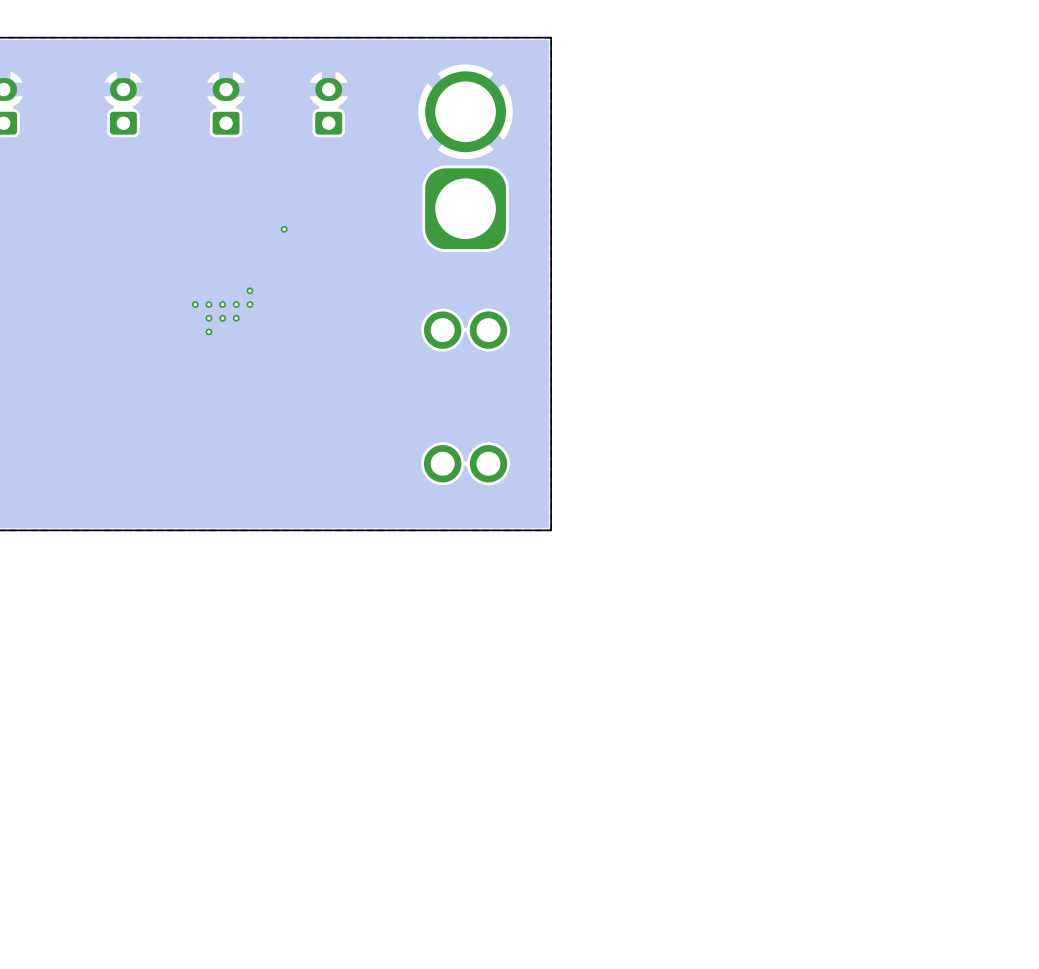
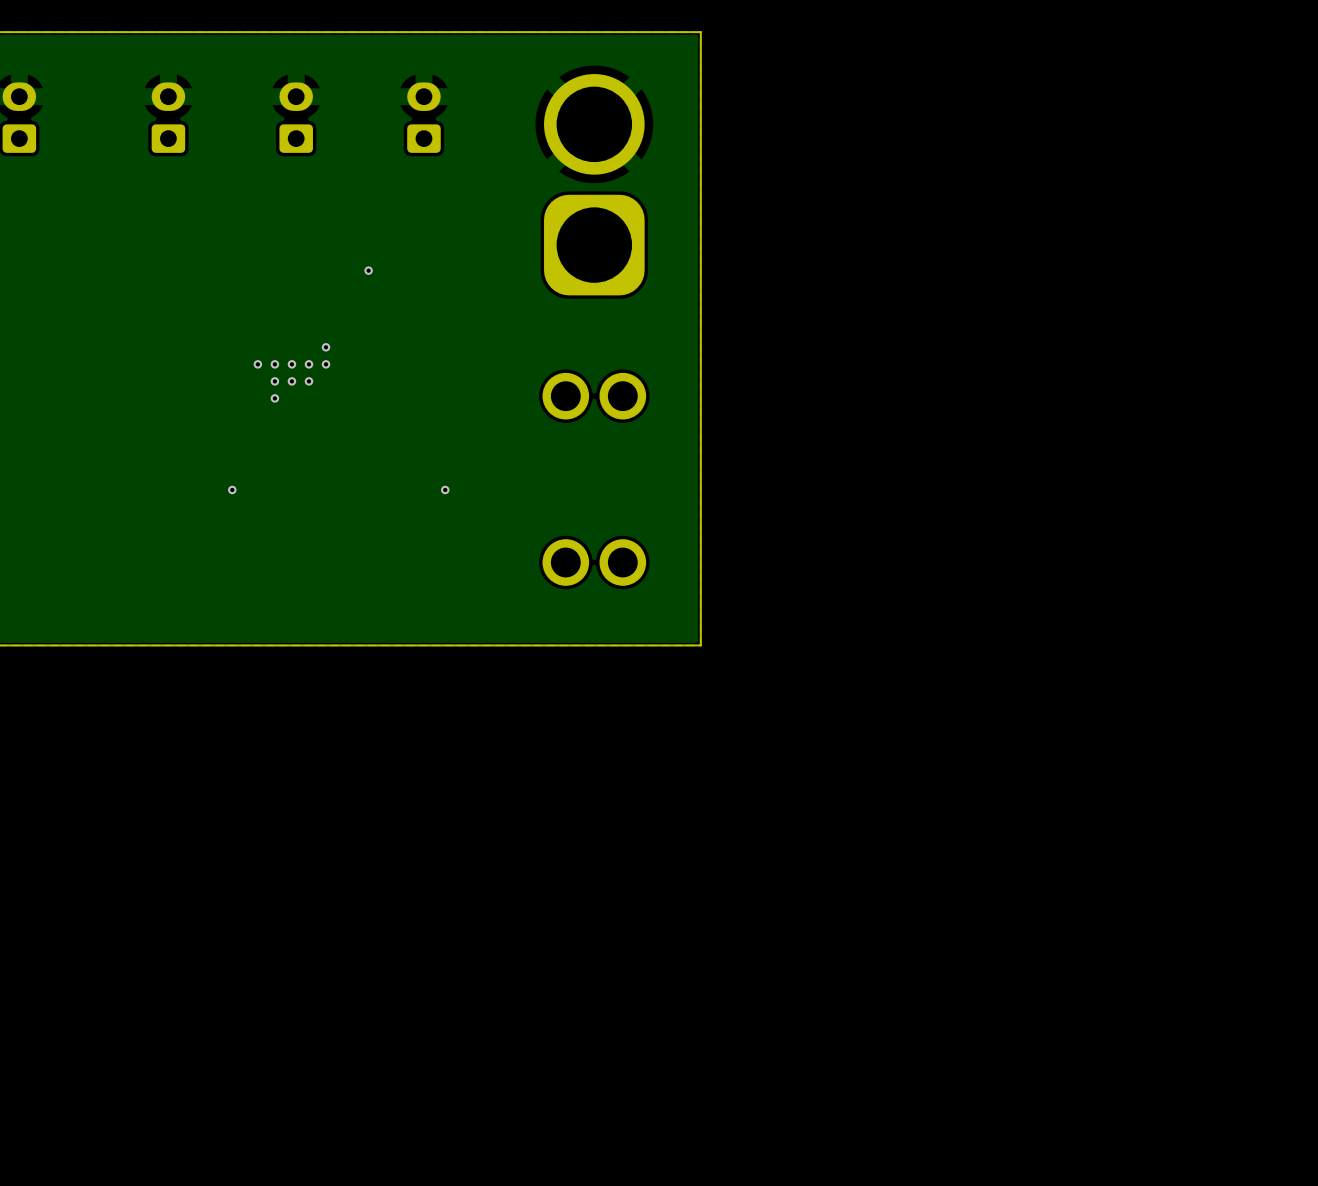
via: none -> (232, 489)
via: none -> (445, 489)

